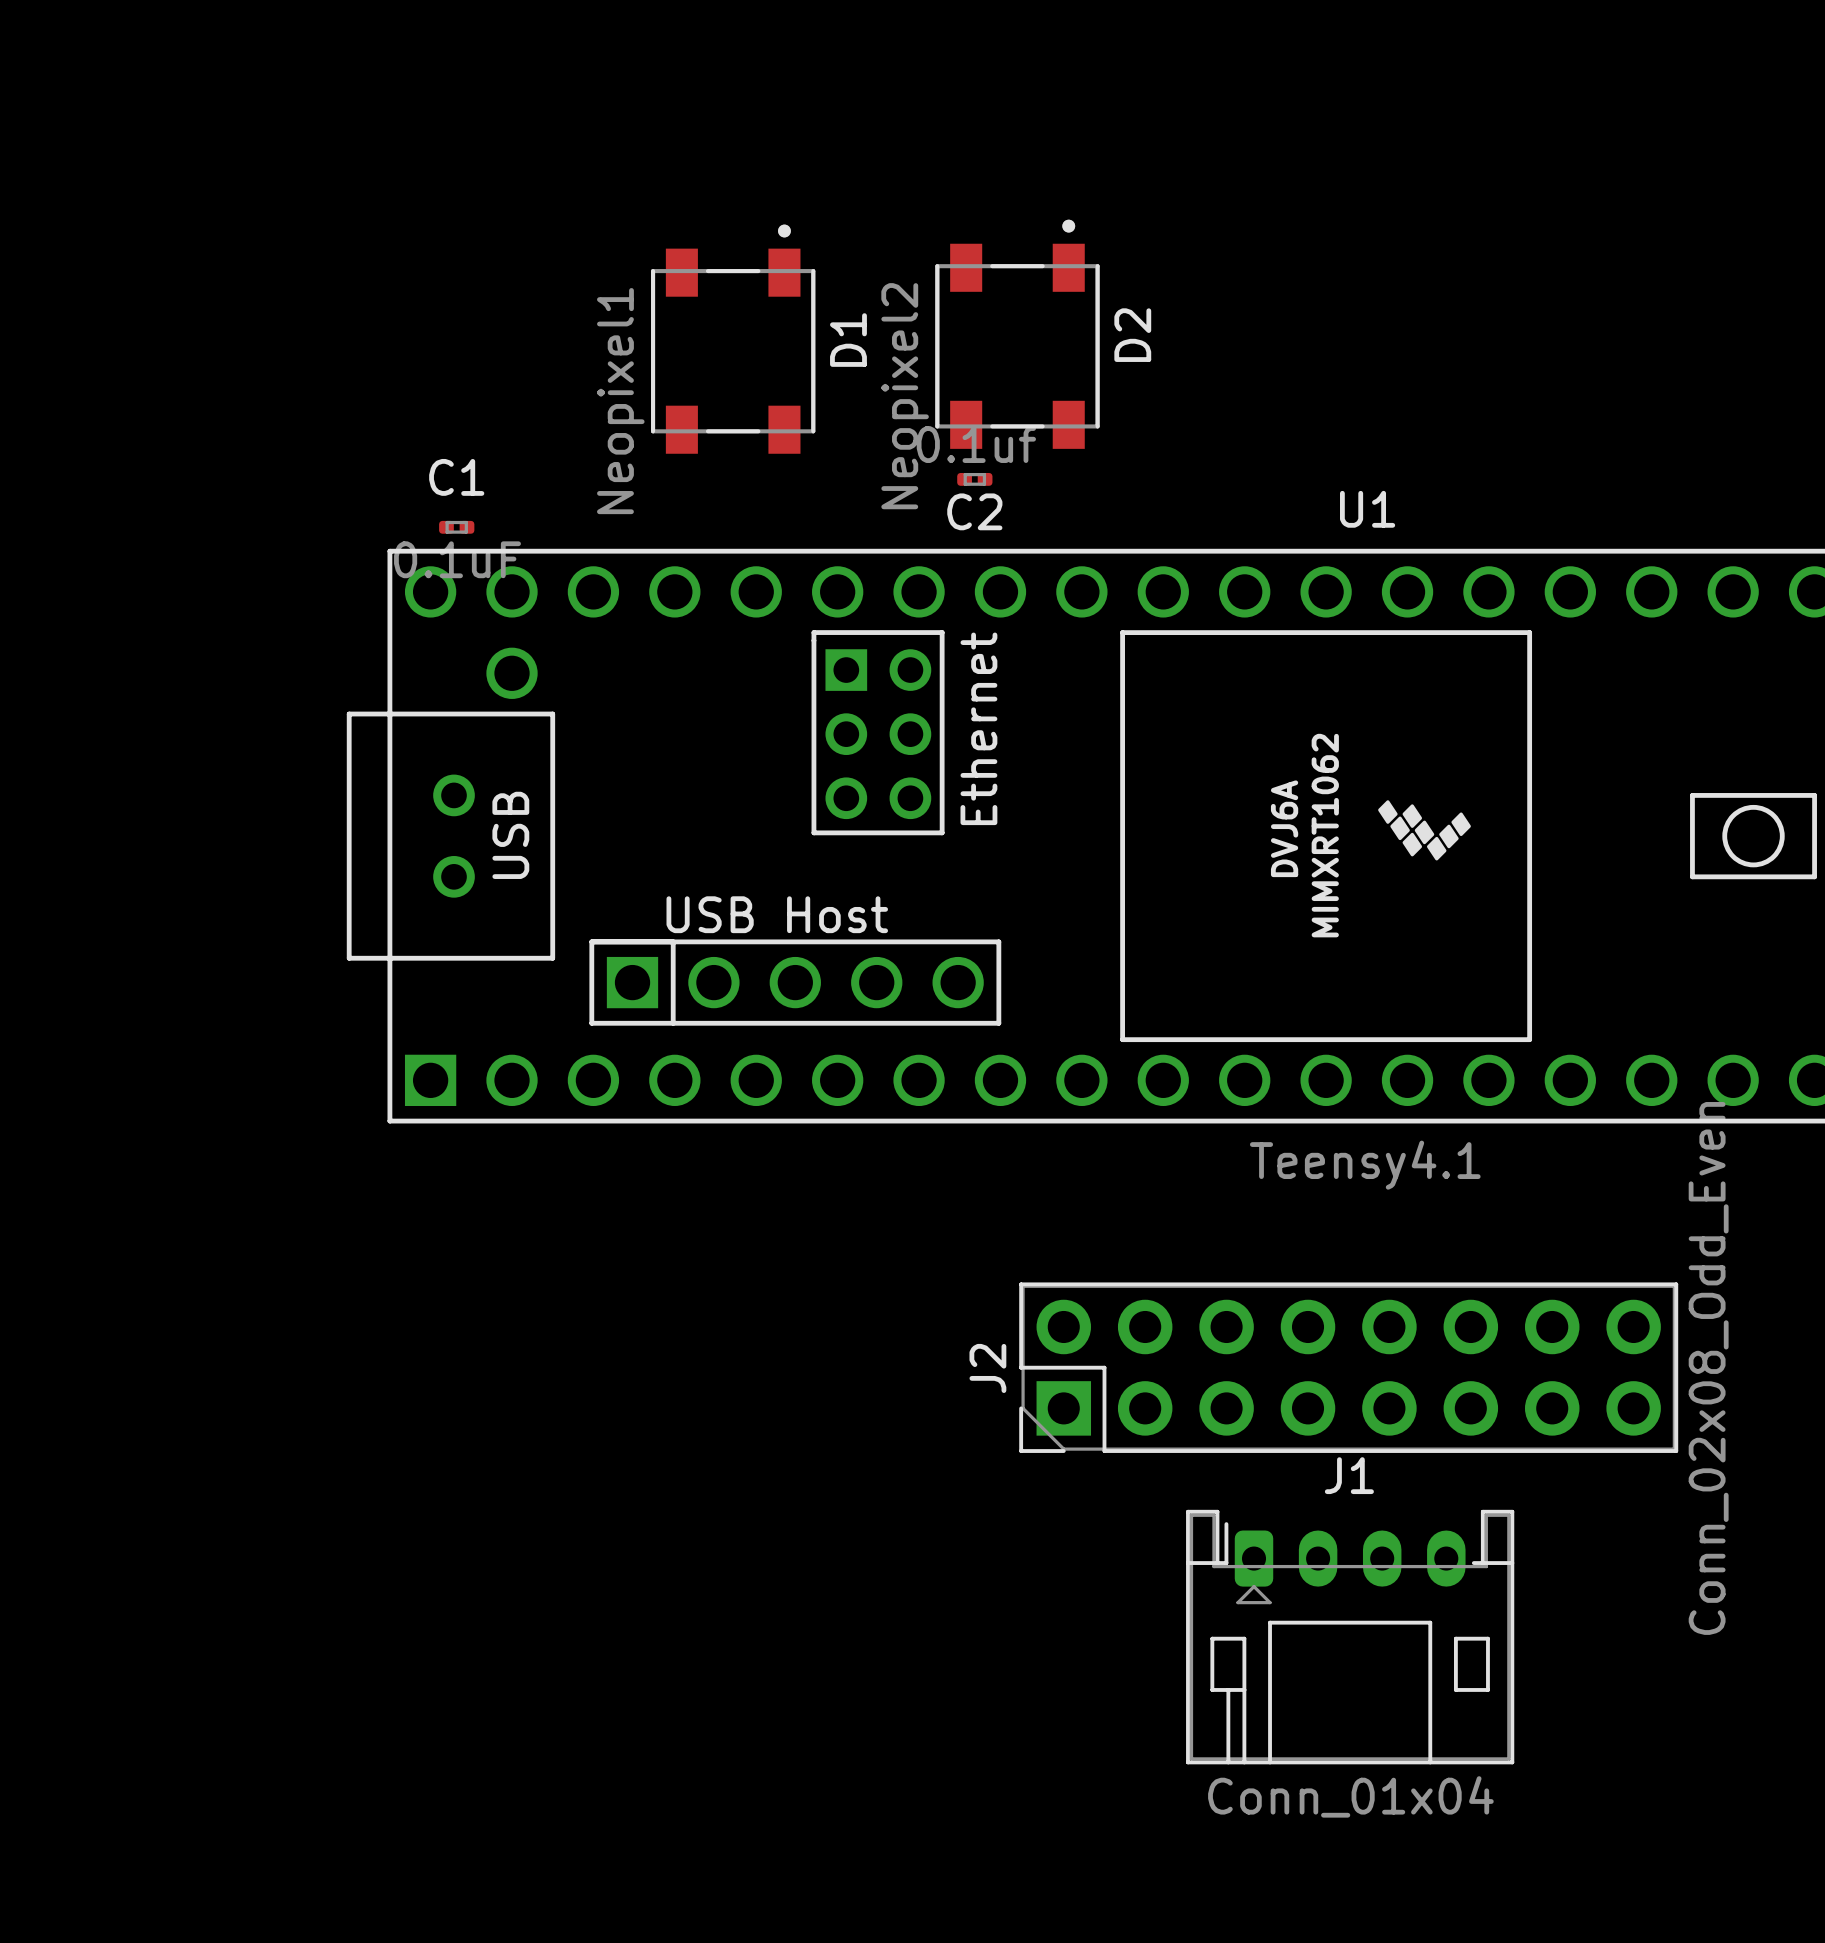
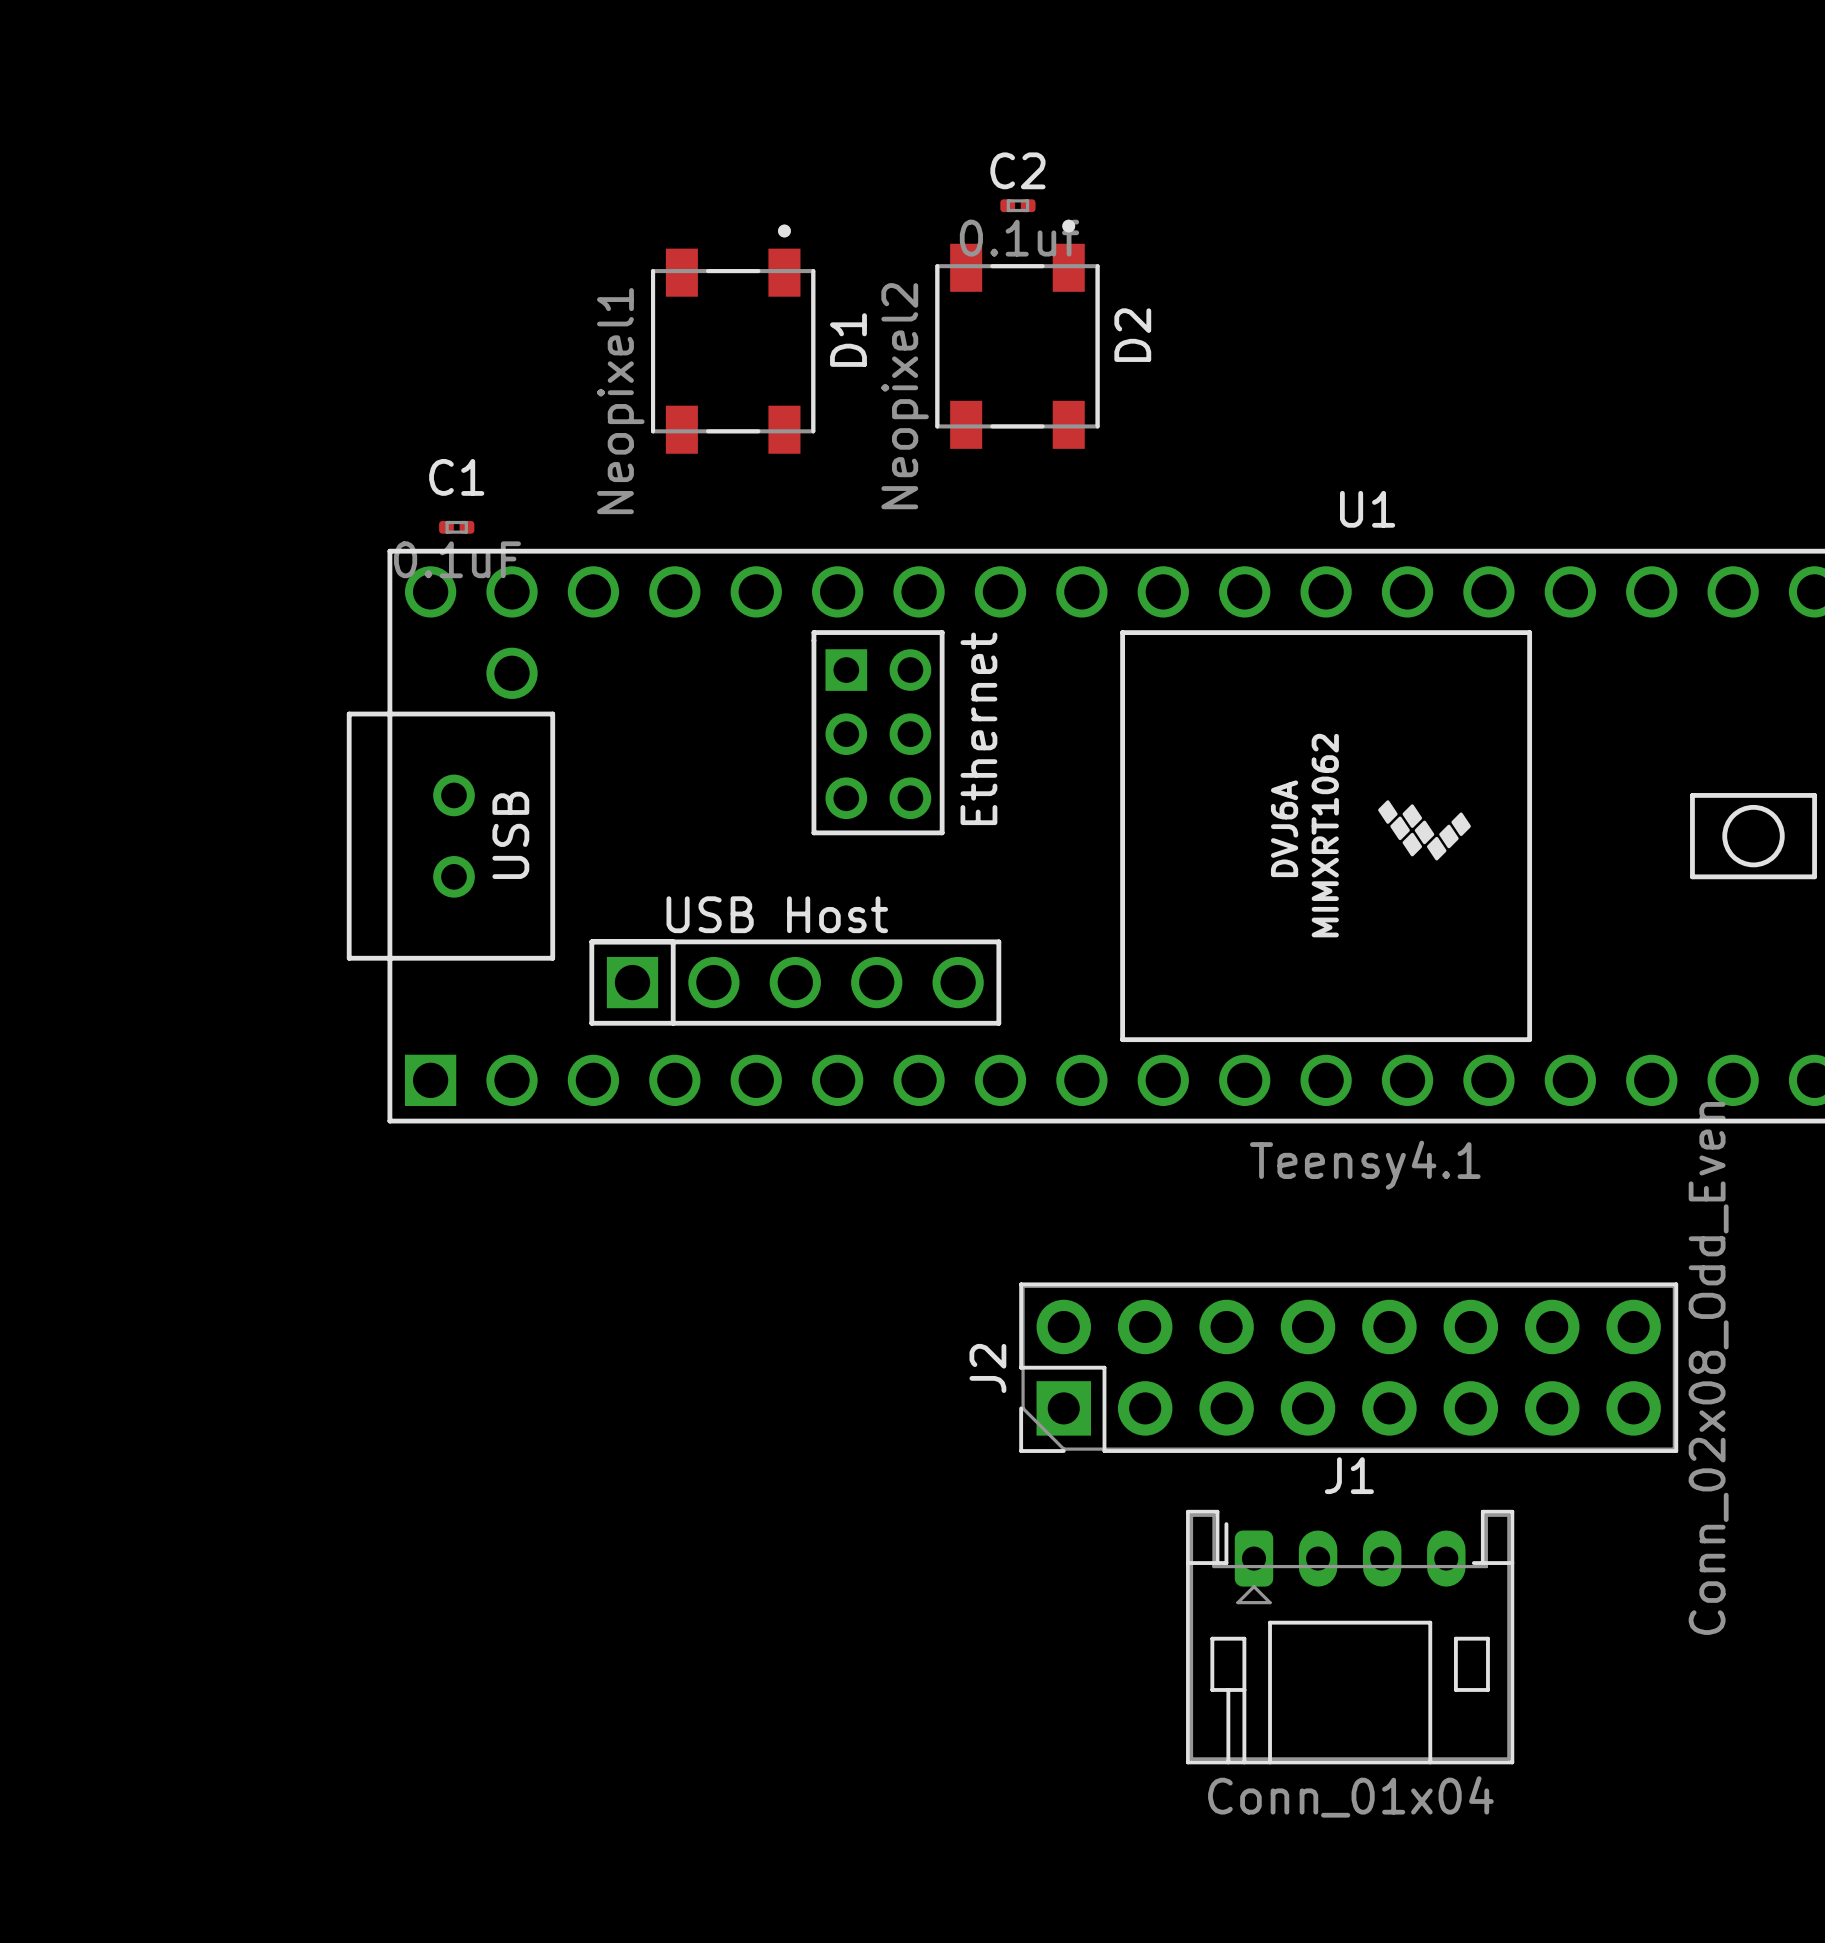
C2 value position: 0.1uf (976, 444) -> 0.1uf (1019, 238)
C2 position: (974, 479) -> (1017, 205)
C2 name position: C2 (974, 511) -> C2 (1017, 170)

